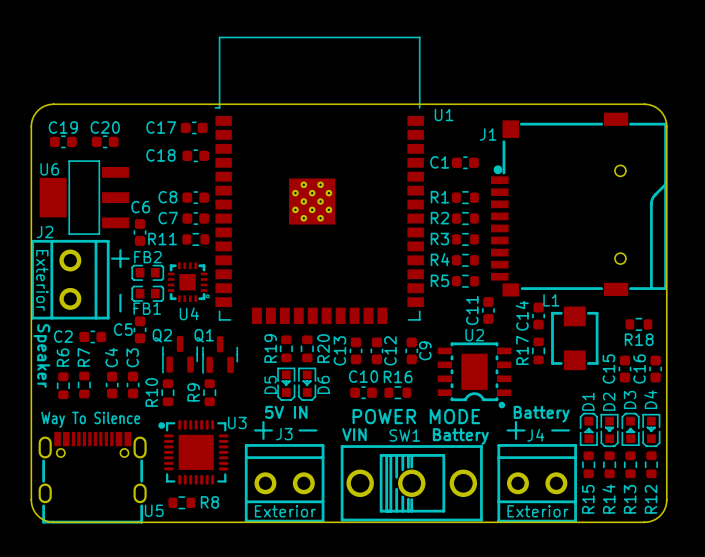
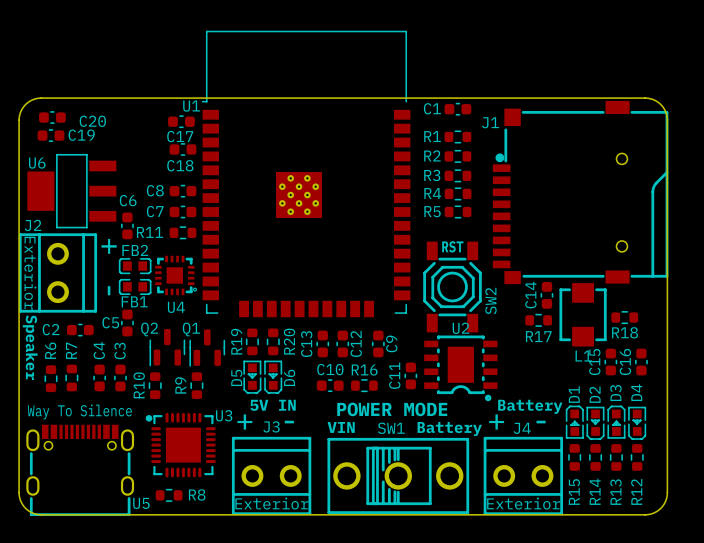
board edge: (644, 104) (651, 105) (660, 110) (665, 119) (666, 126) (666, 502) (660, 515) (654, 520) (644, 522) -> (630, 98) (647, 98) (656, 101) (665, 110) (667, 120) (667, 495) (663, 504) (654, 512) (630, 514)
J1 footprint: [490, 112, 667, 297] -> [492, 100, 669, 285]
U1 name position: U1 (444, 114) -> U1 (191, 106)
C19 name position: C19 (63, 127) -> C19 (81, 135)
C17 name position: C17 (161, 127) -> C17 (180, 136)
C20 position: (105, 141) -> (52, 117)
C18 name position: C18 (160, 155) -> C18 (180, 165)
C1 position: (465, 162) -> (457, 109)
R1 position: (465, 197) -> (457, 136)
R2 position: (465, 218) -> (457, 156)
R3 position: (465, 239) -> (457, 175)
text: none -> RST (452, 246)
R4 position: (465, 260) -> (458, 193)
R5 position: (465, 281) -> (458, 211)
SW2: none -> (452, 287)
L1 name position: L1 (551, 300) -> L1 (583, 356)
C11 position: (488, 310) -> (410, 375)
C14 position: (538, 316) -> (546, 295)
L1 position: (574, 338) -> (583, 314)
R19: none -> (252, 341)
R19 name: R19 (270, 348) -> R20 (289, 341)
R20: (307, 348) -> none
C13: none -> (322, 343)
C13 name: C13 (339, 350) -> C12 (356, 343)
C12: (376, 350) -> none
C9 position: (411, 350) -> (378, 343)
R17 name position: R17 (522, 350) -> R17 (538, 336)
R17 rotation: 0° (538, 350) -> 90° clockwise (538, 320)
R17 position: (538, 350) -> (538, 320)
D5: none -> (252, 377)
D5 name: D5 (270, 384) -> D6 (289, 377)
D6: (307, 384) -> none
C10 position: (363, 392) -> (330, 385)
R16 position: (397, 392) -> (364, 385)

